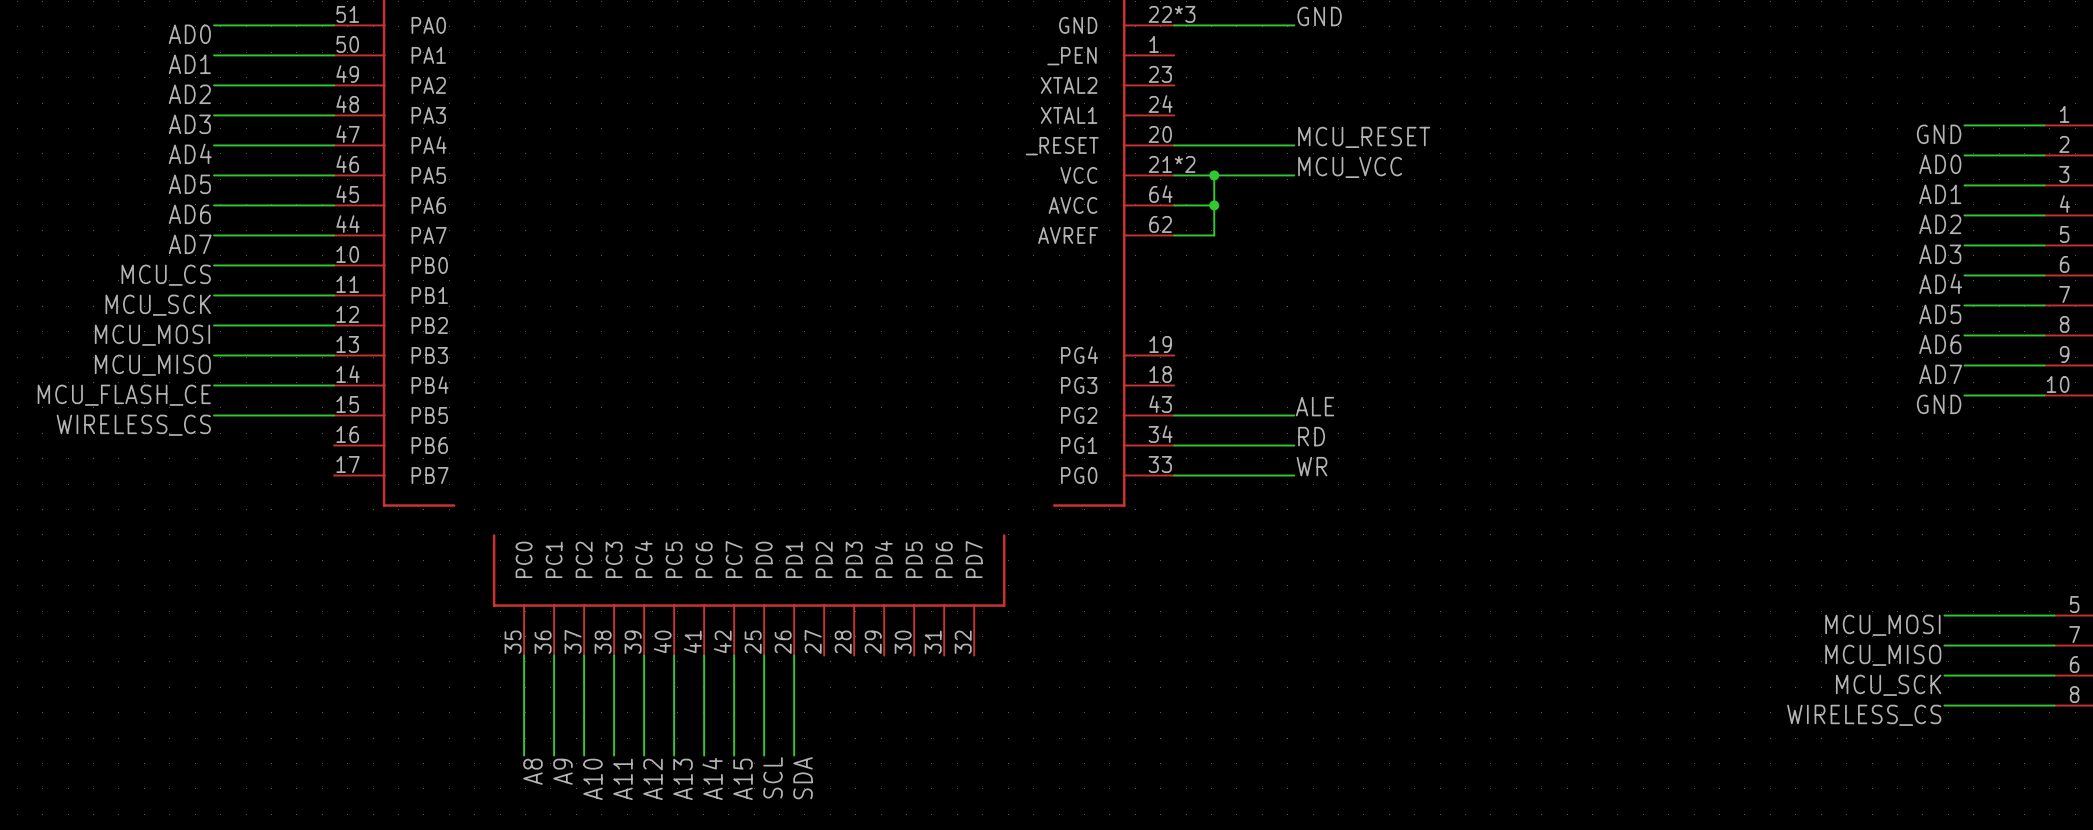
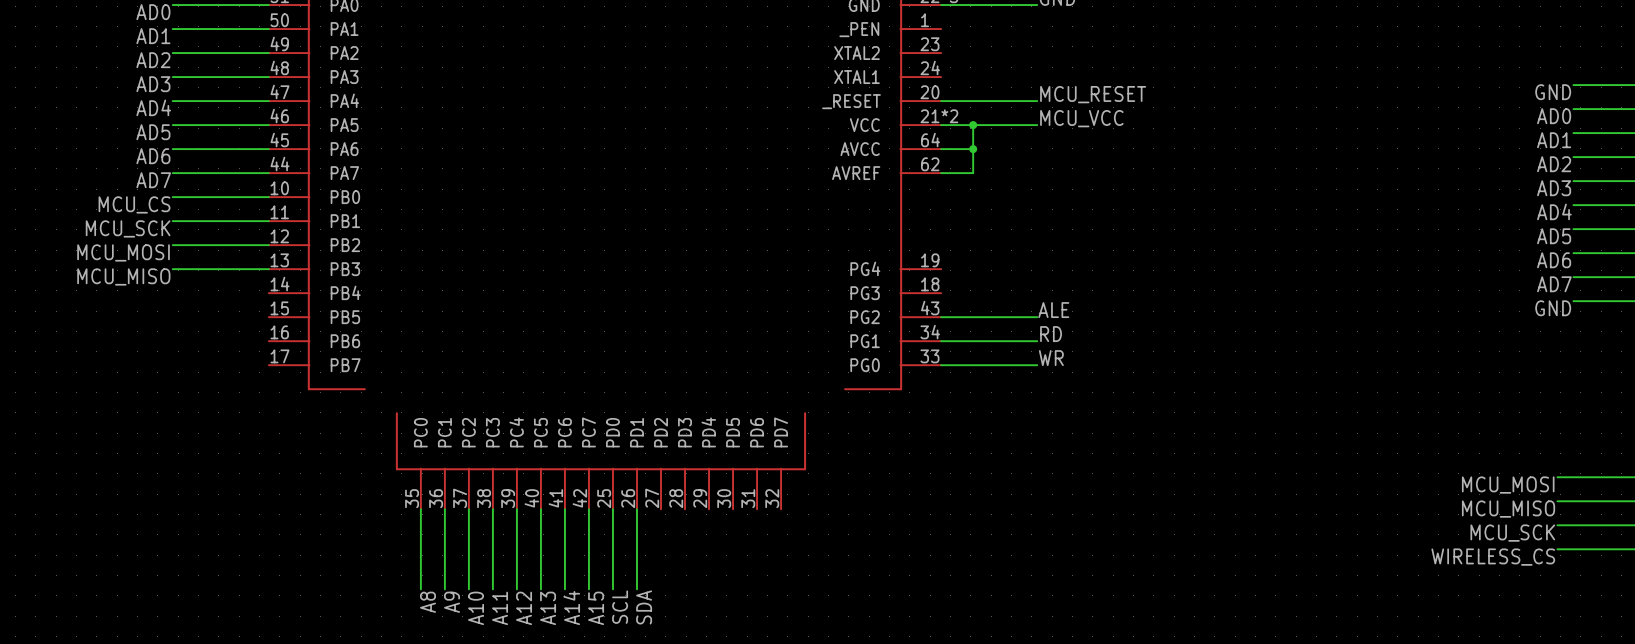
wire: (214, 385) (334, 385) -> none
label: MCU_FLASH_CE (124, 395) -> none
wire: (214, 415) (334, 415) -> none
label: WIRELESS_CS (133, 425) -> none

